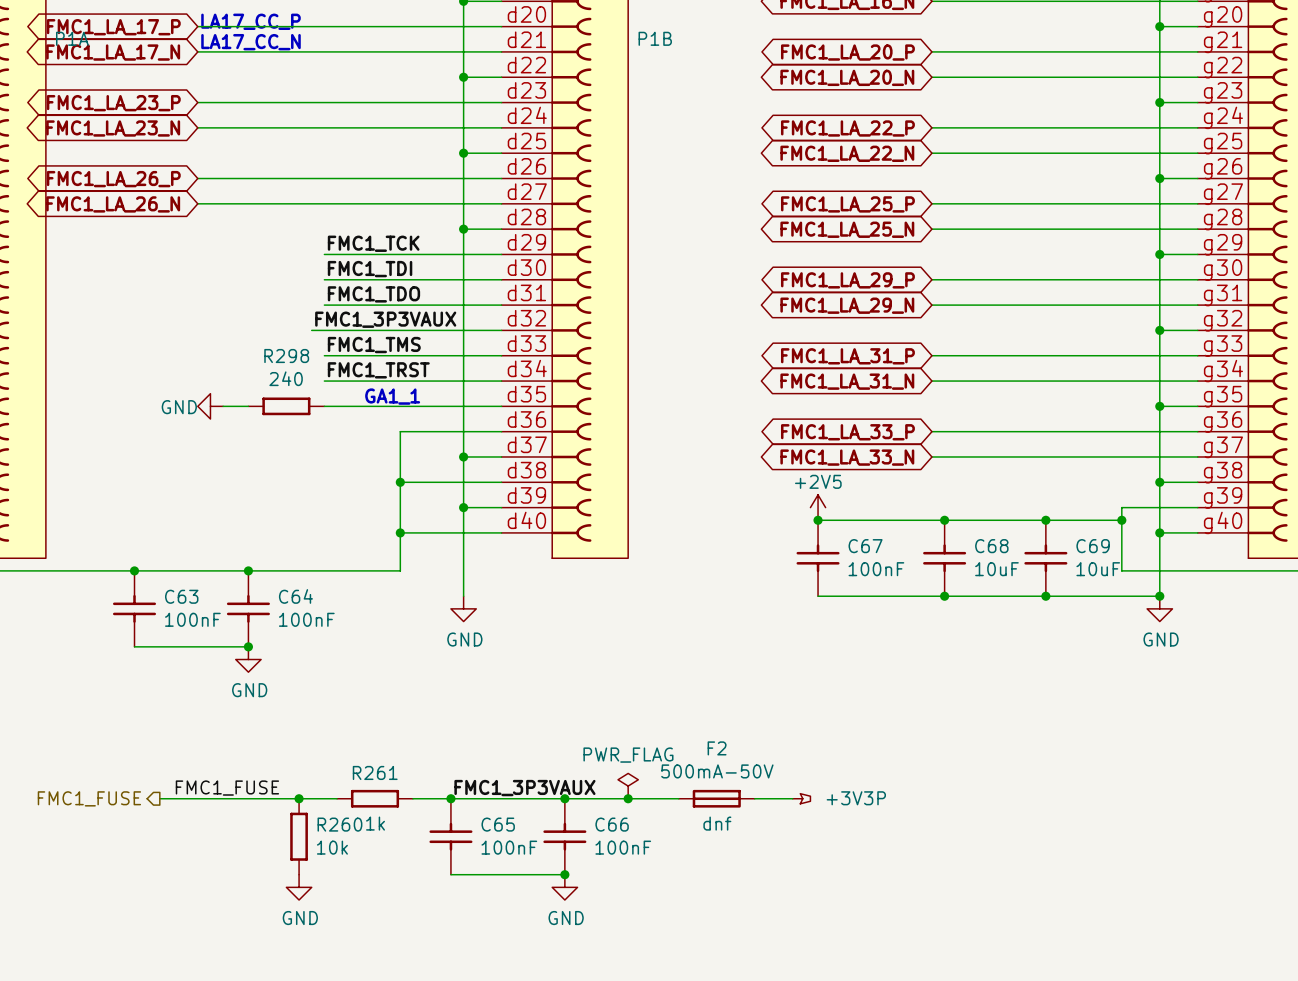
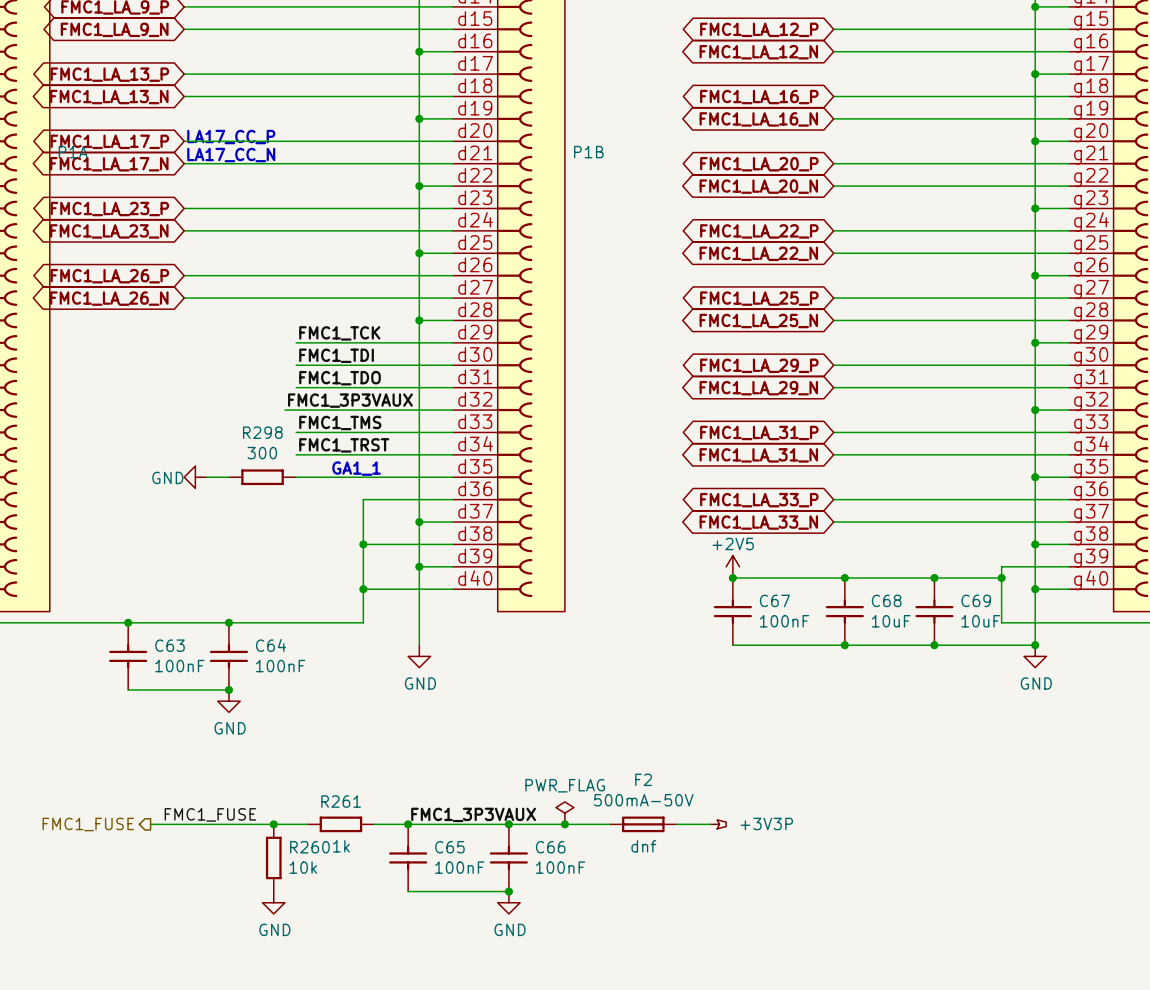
R298 text: 240 (286, 378) -> 300 (262, 453)

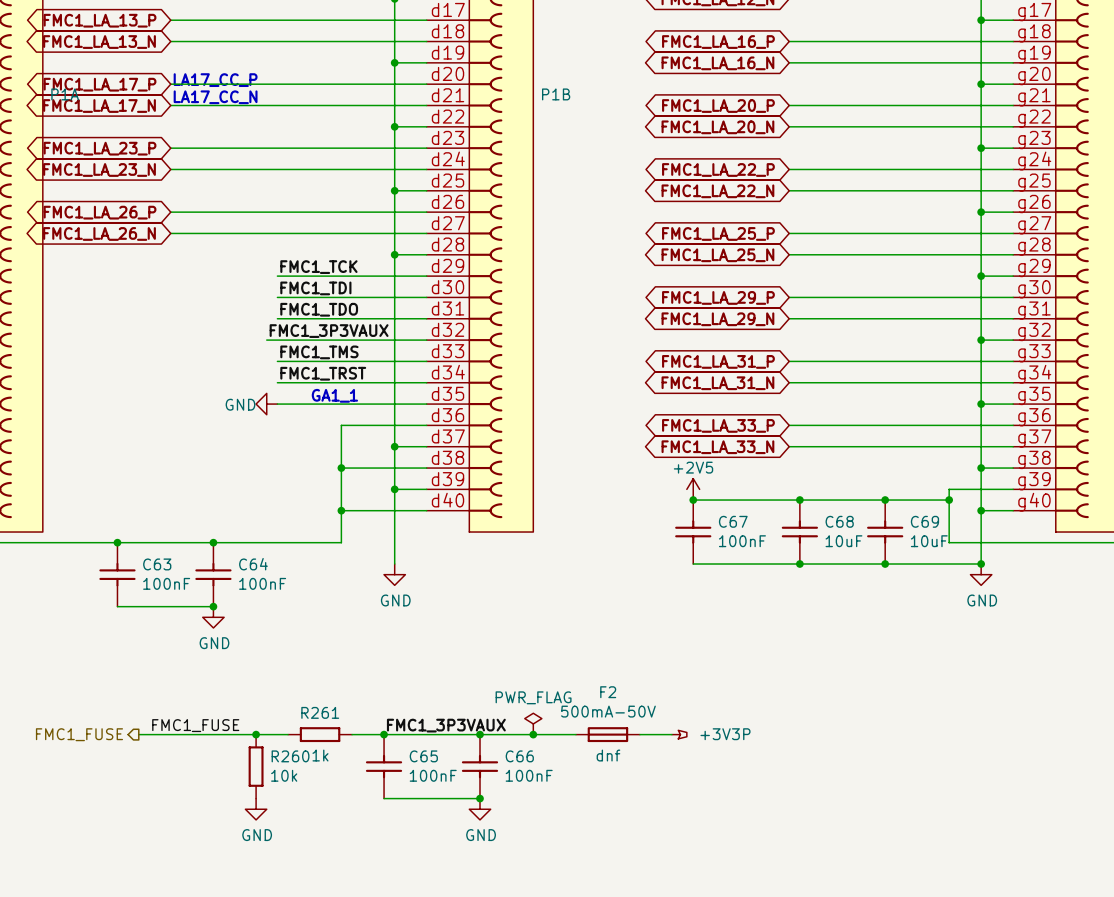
power symbol position: GND (195, 477) -> GND (266, 404)
wire: (206, 477) (228, 477) -> none
R298: (262, 477) -> none

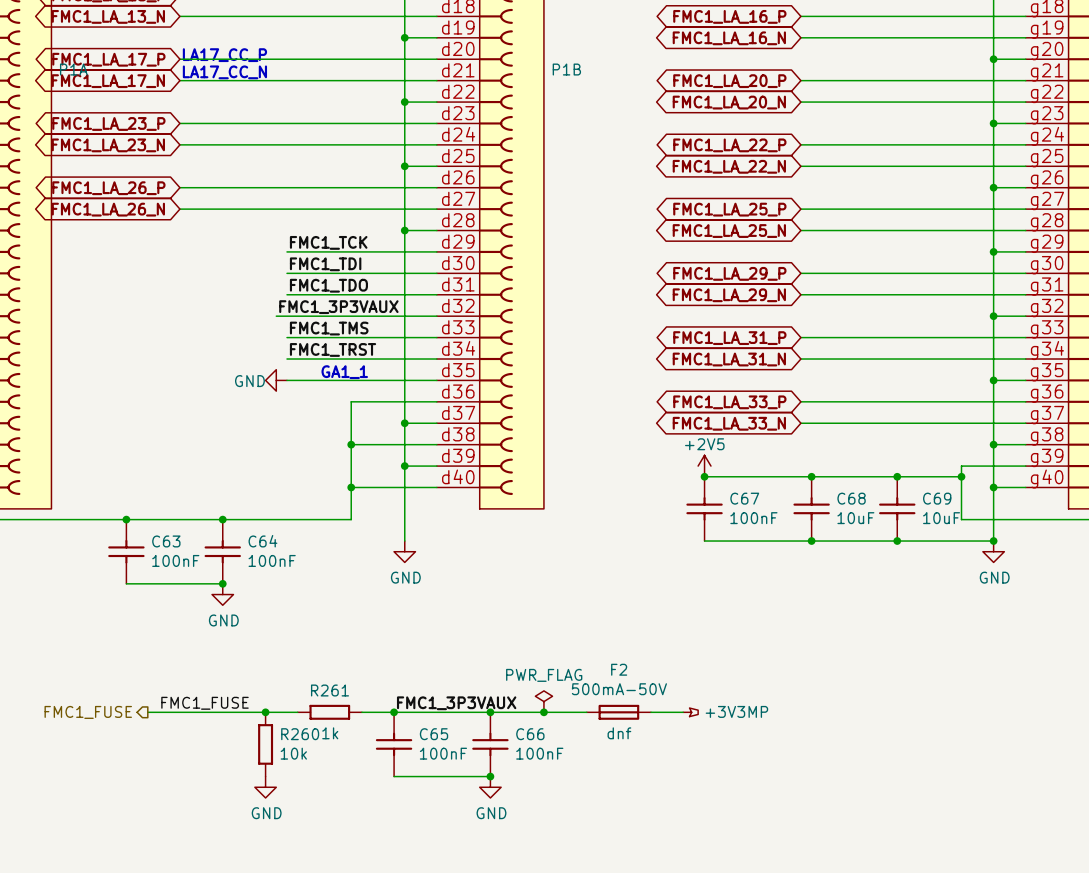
power symbol: +3V3P (679, 734) -> +3V3MP (690, 712)

